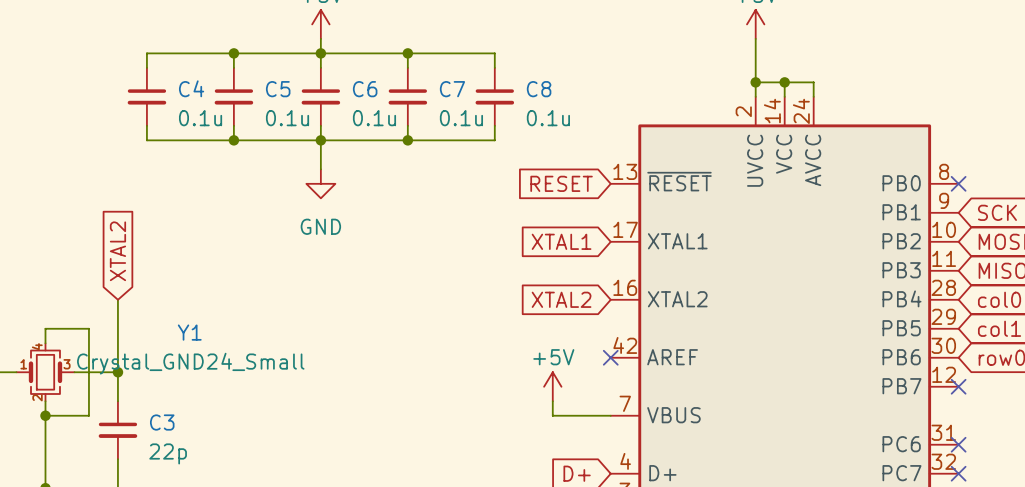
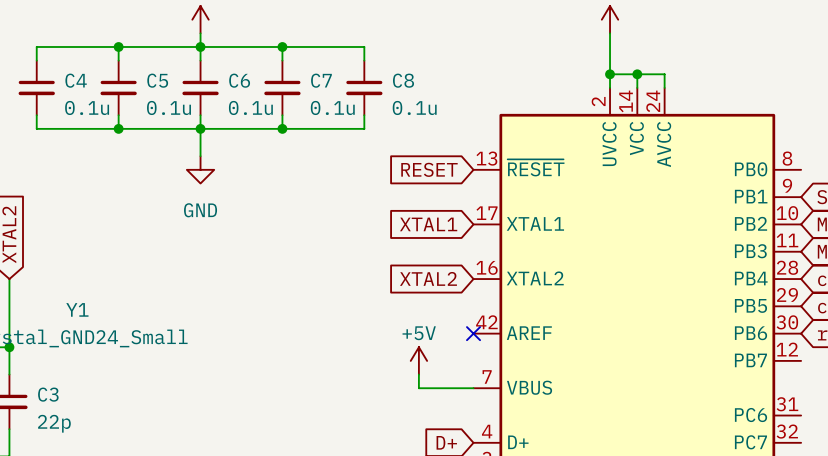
no-connect mark: (958, 183) -> none
no-connect mark: (958, 386) -> none
no-connect mark: (958, 444) -> none
no-connect mark: (958, 473) -> none

